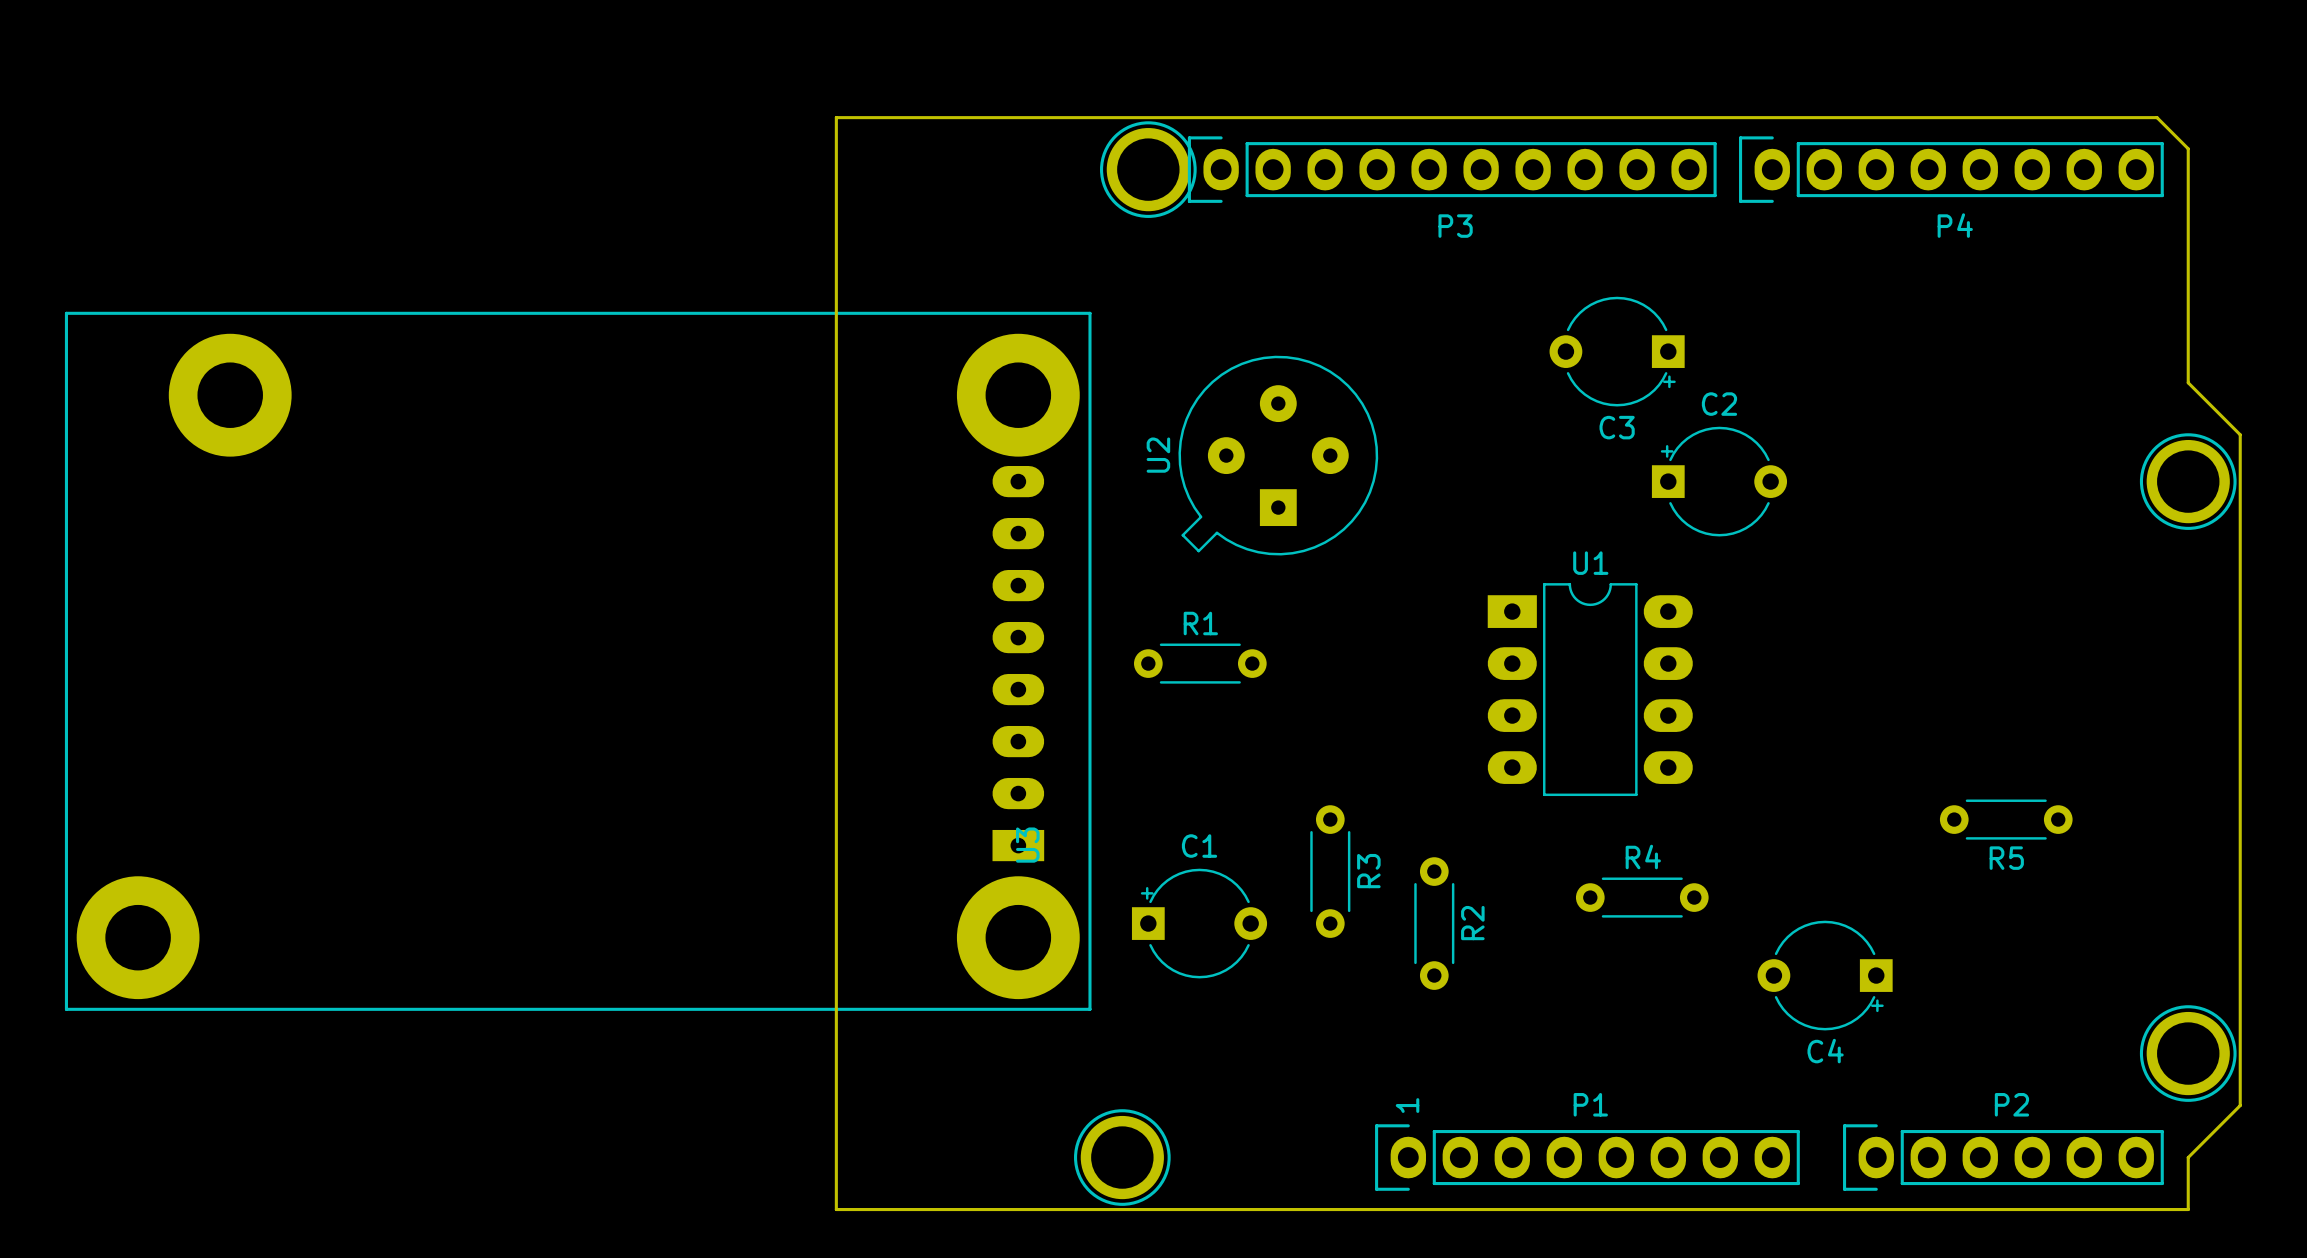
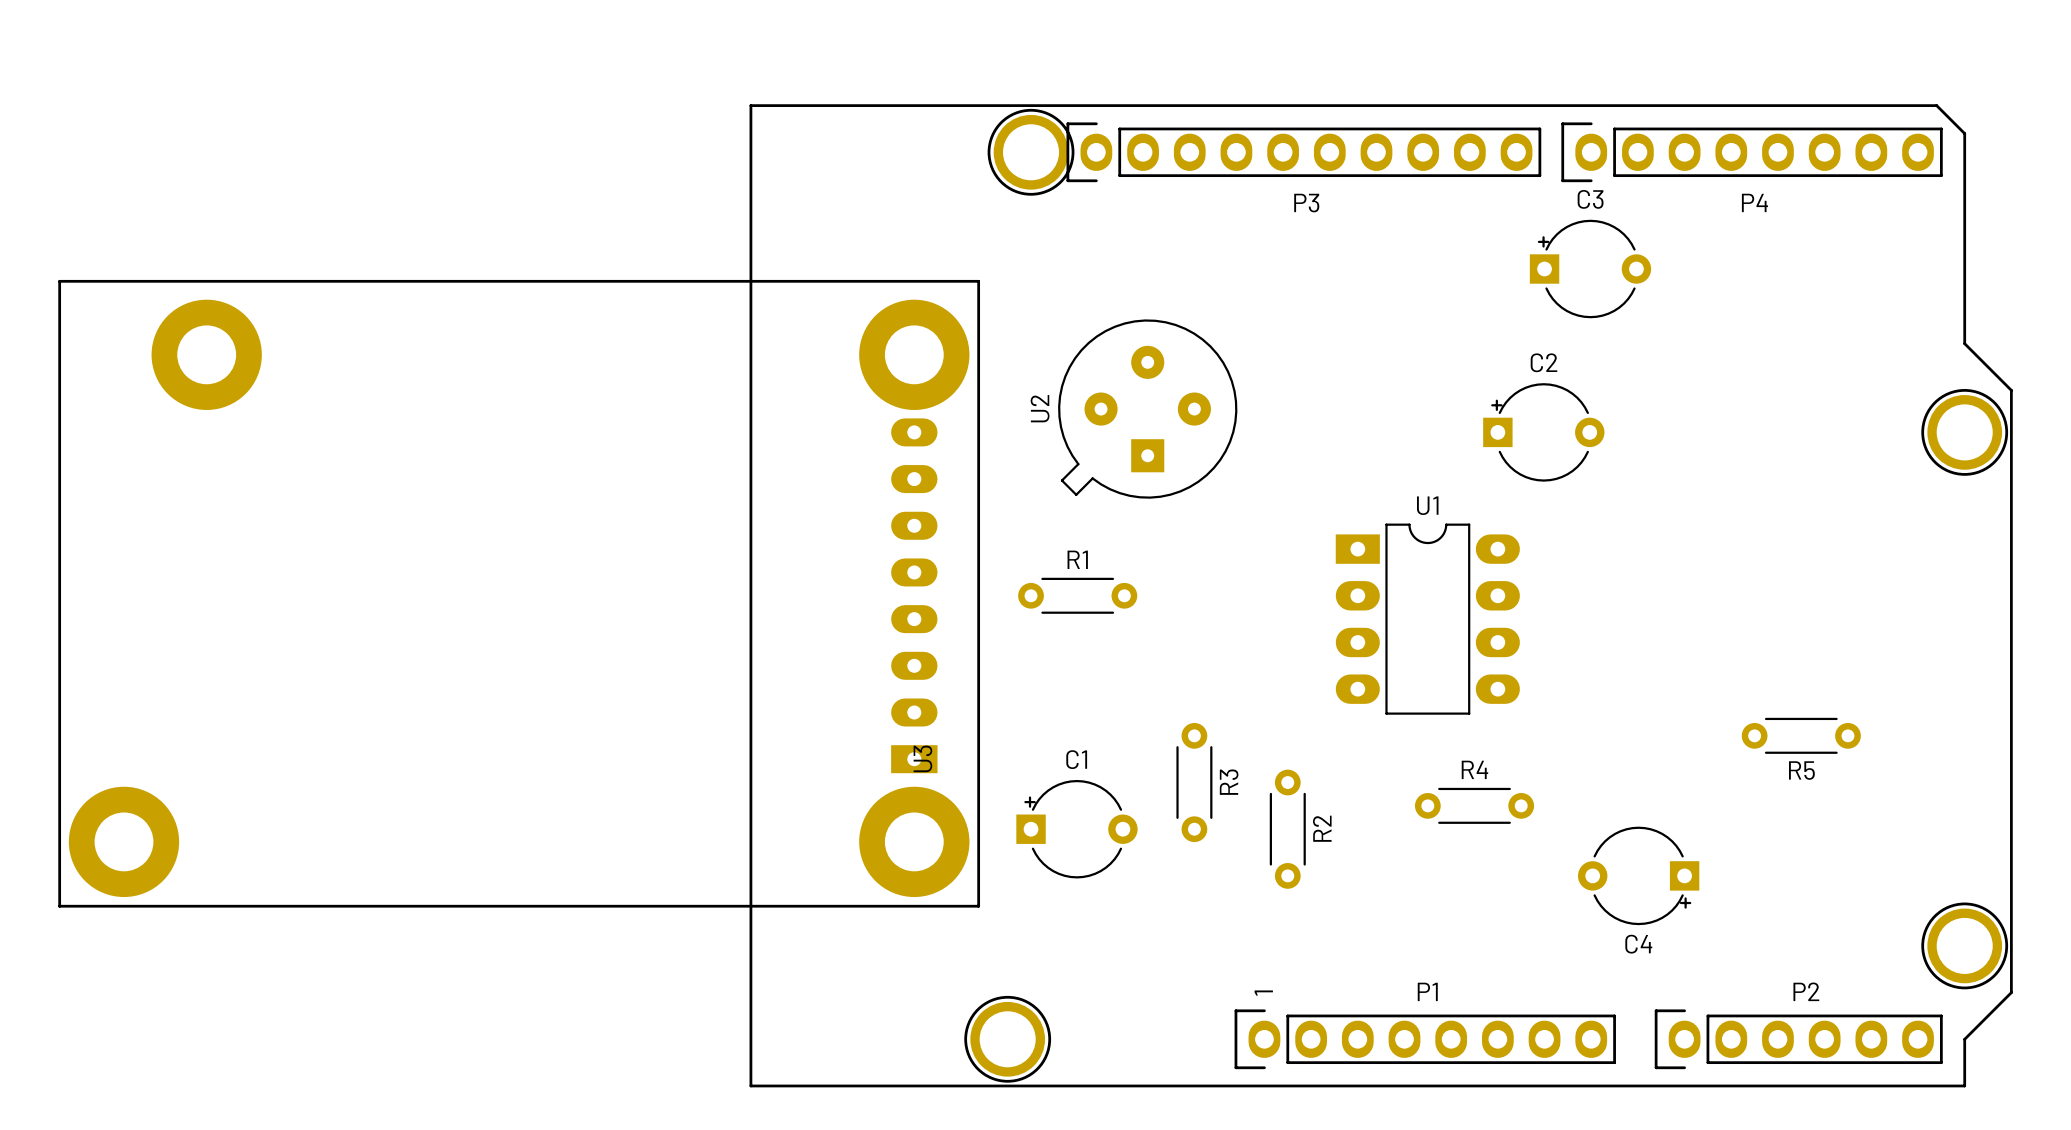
C3 rotation: 0° (1617, 351) -> 180° (1590, 269)
C3 position: (1617, 351) -> (1590, 269)

